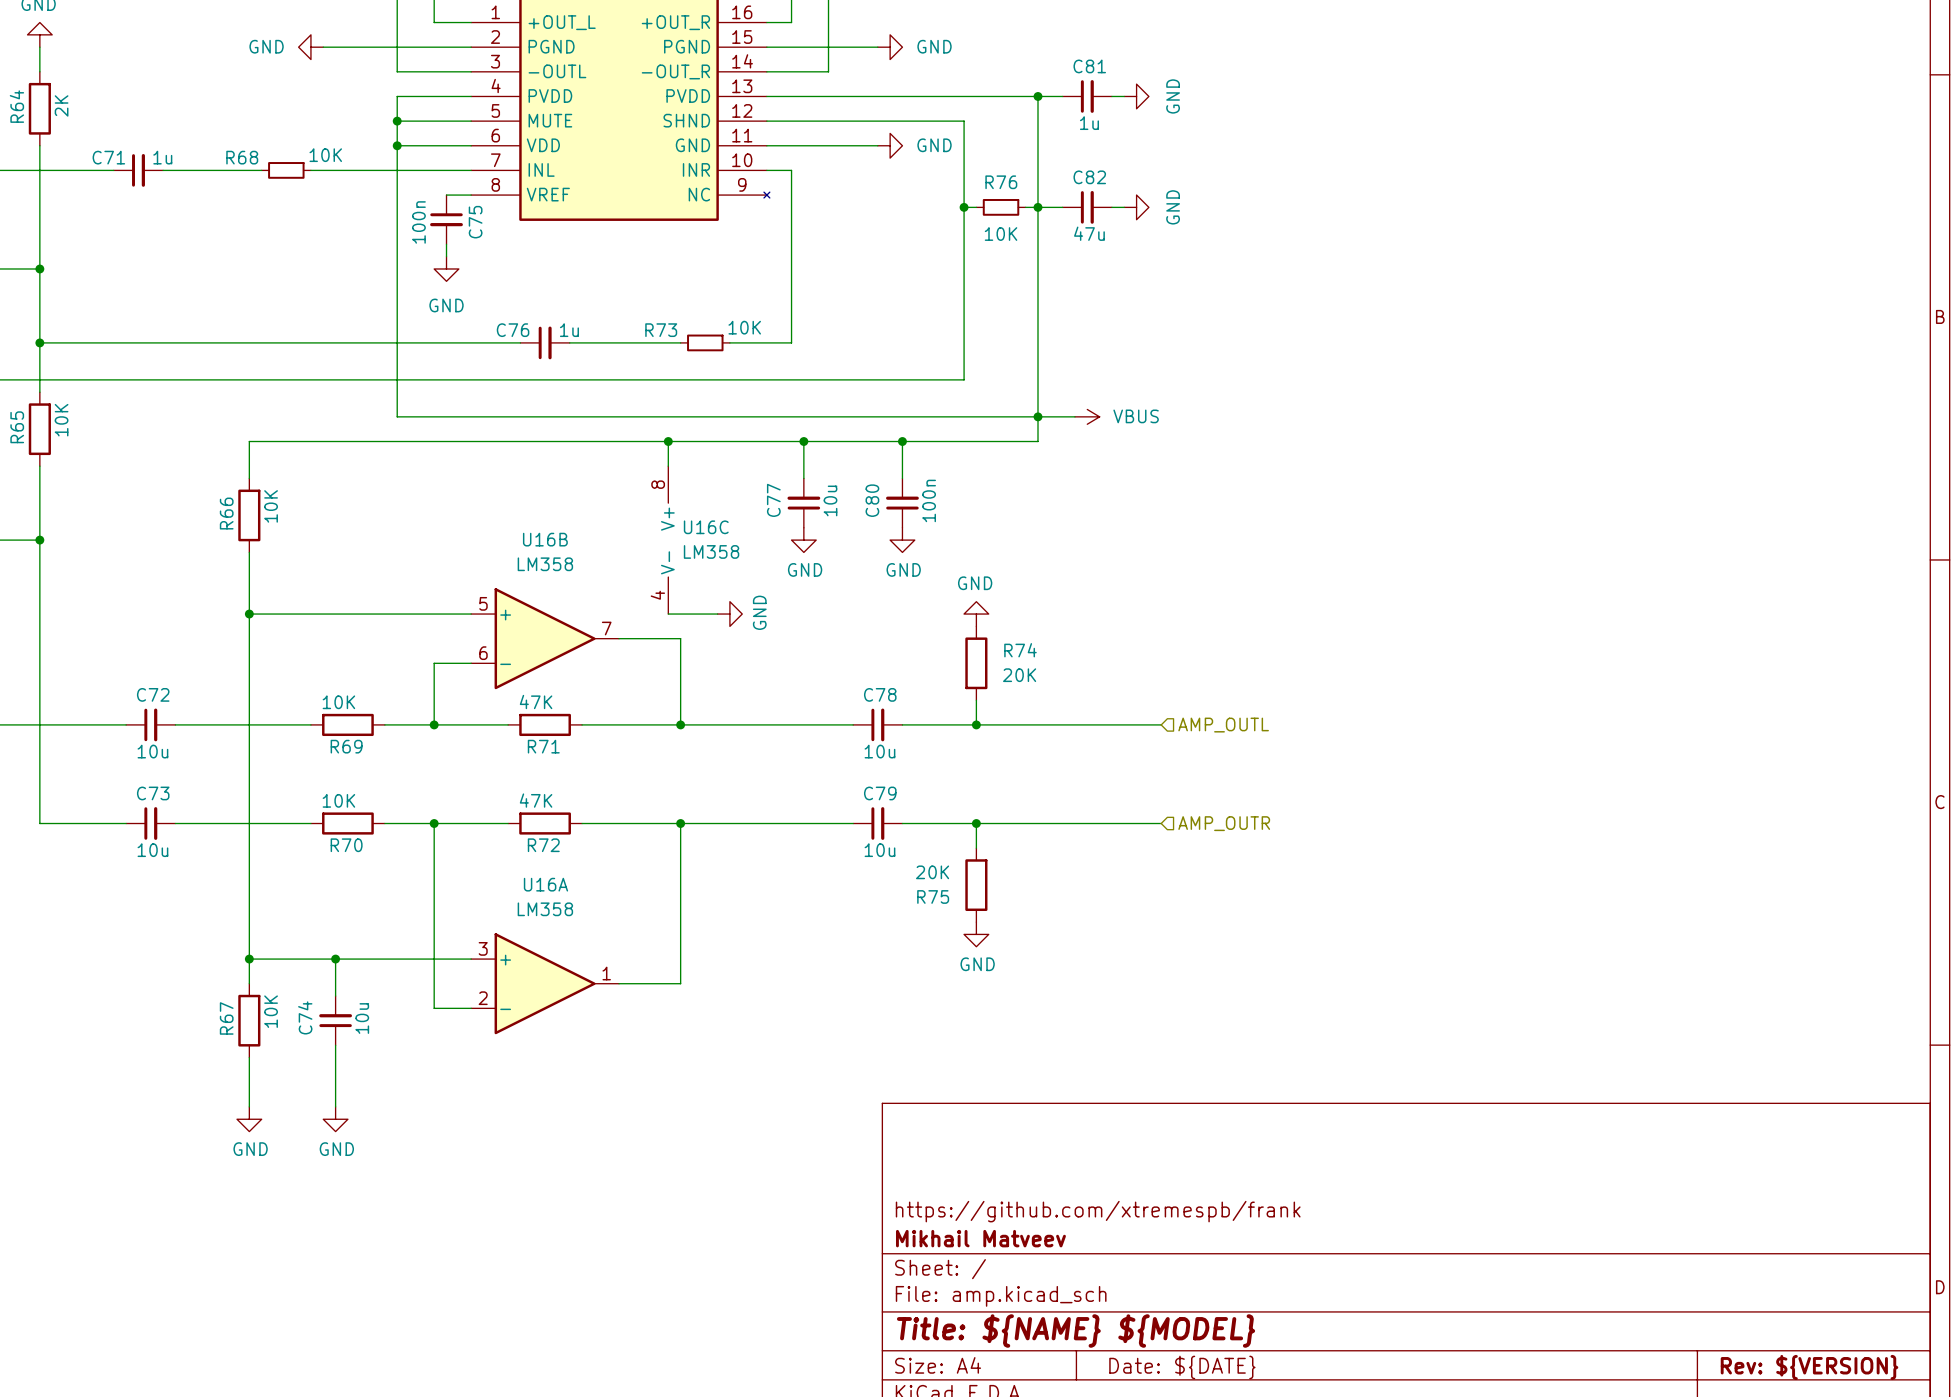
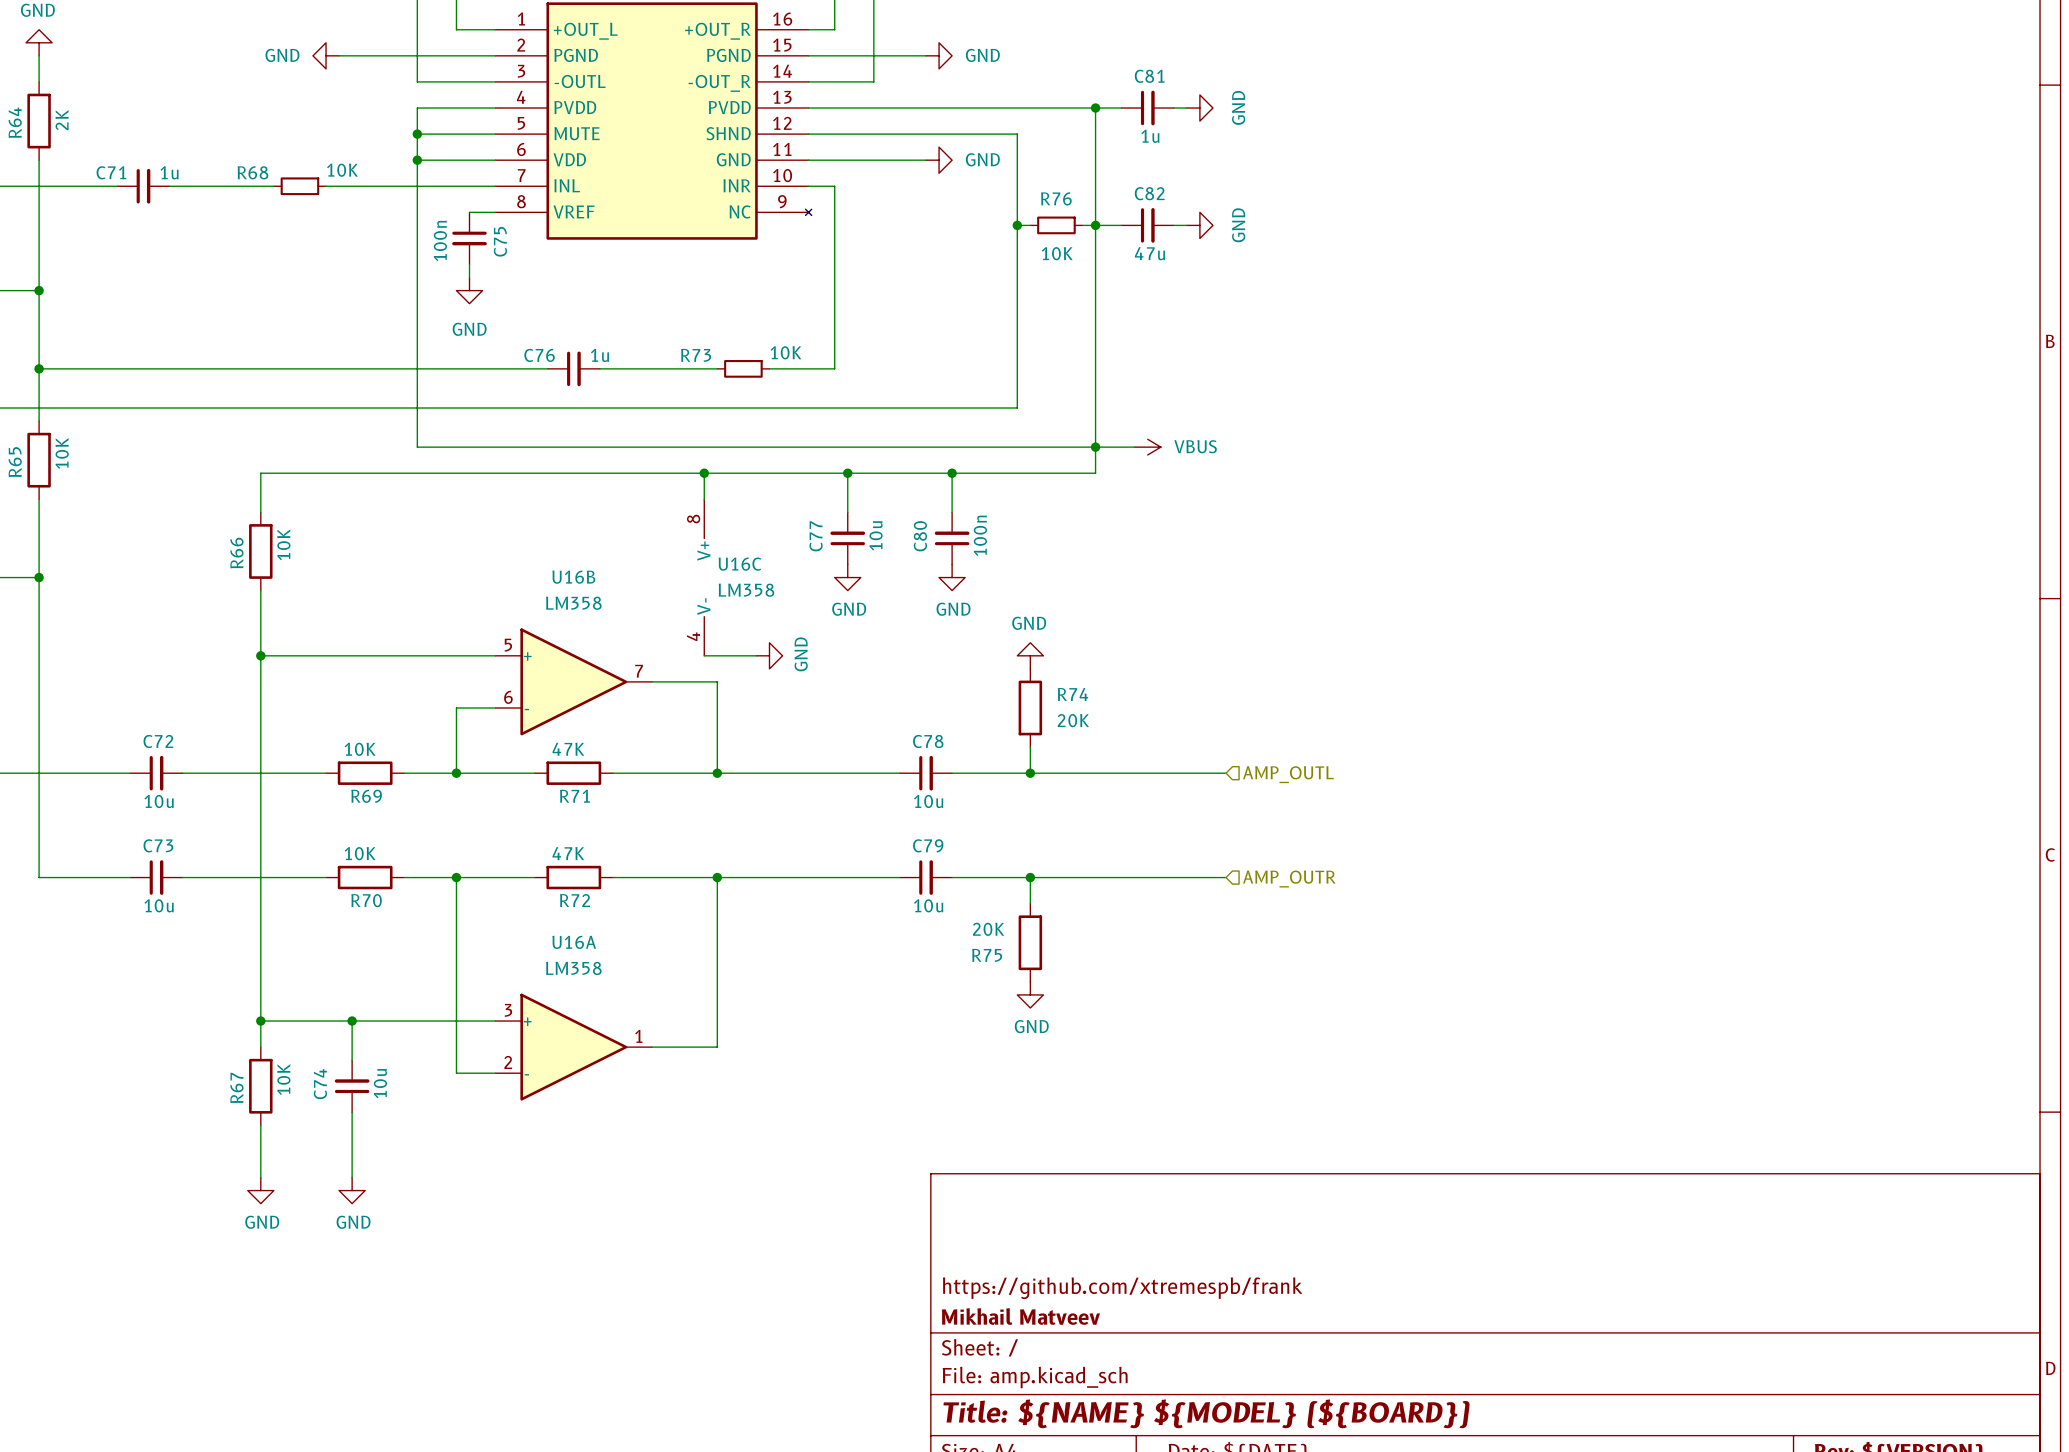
title block: Title: ${NAME} ${MODEL} (1076, 1331) -> Title: ${NAME} ${MODEL} (${BOARD}) (1206, 1413)

